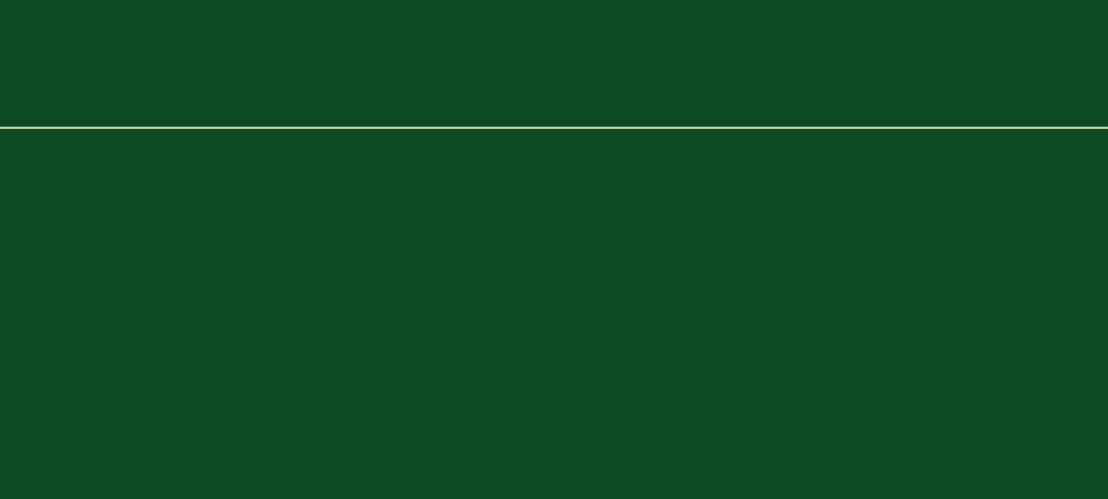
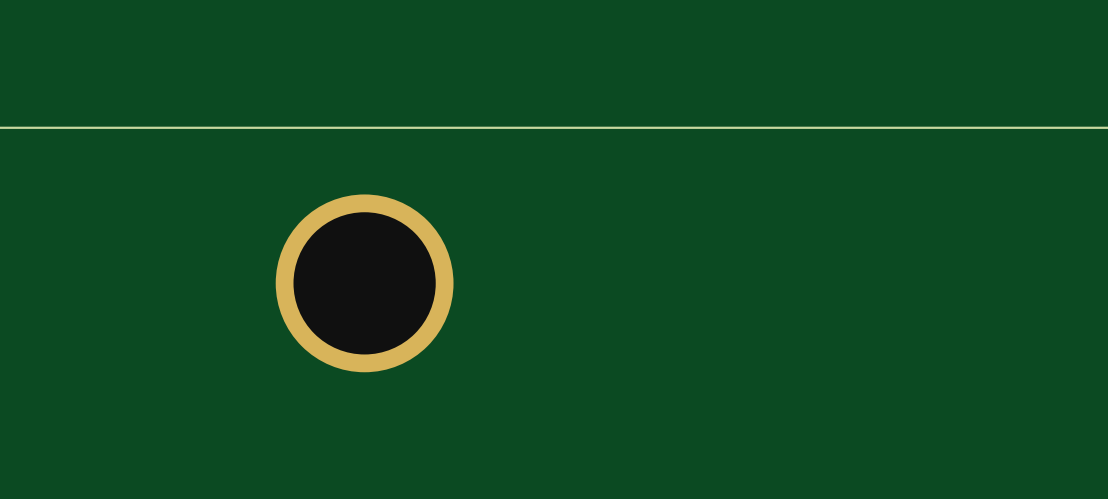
part: none -> (364, 283)

